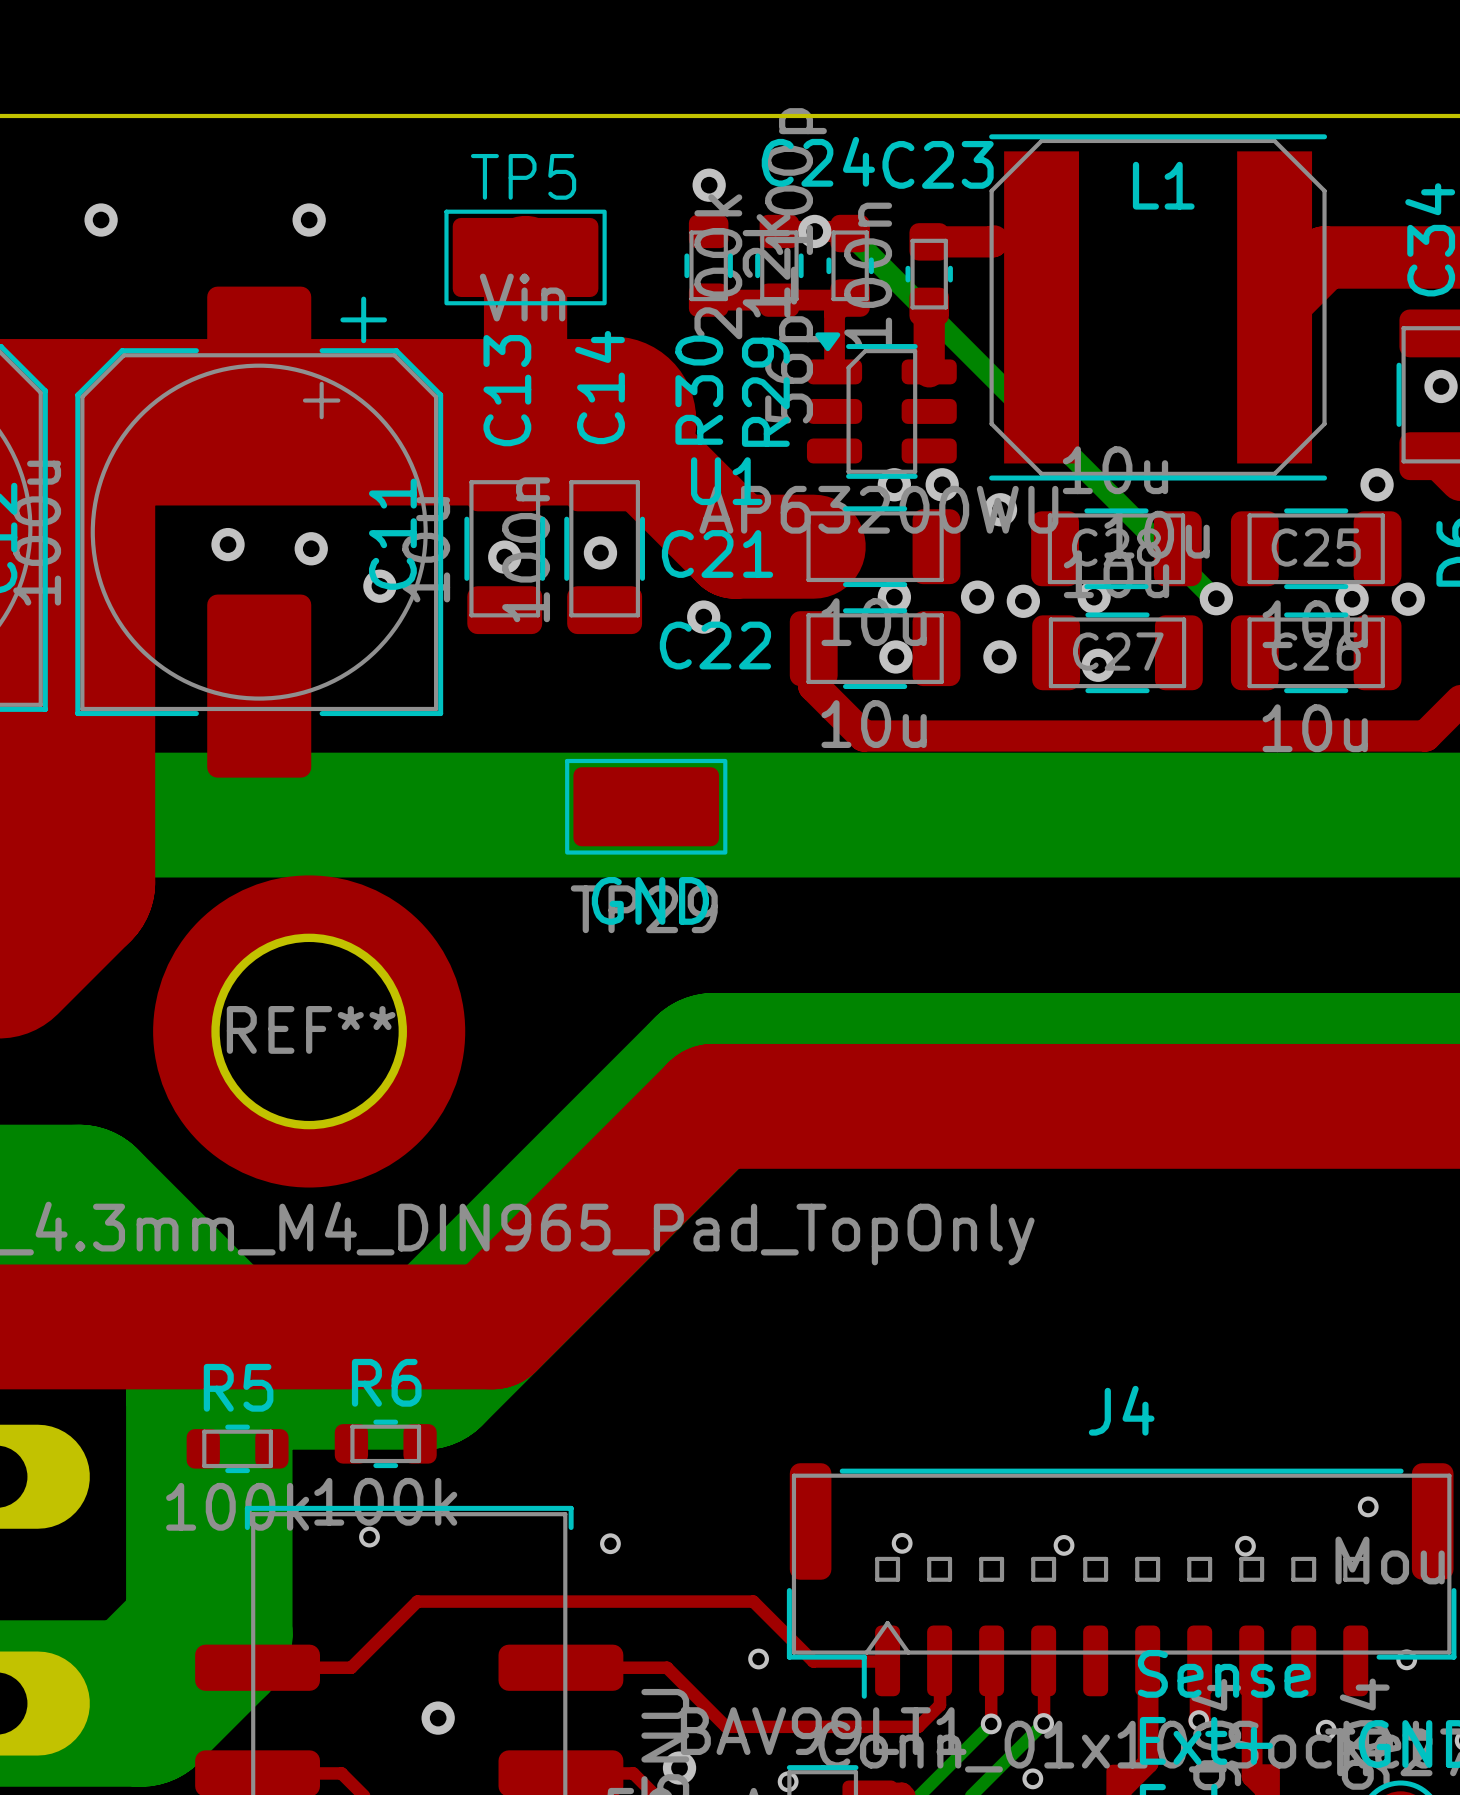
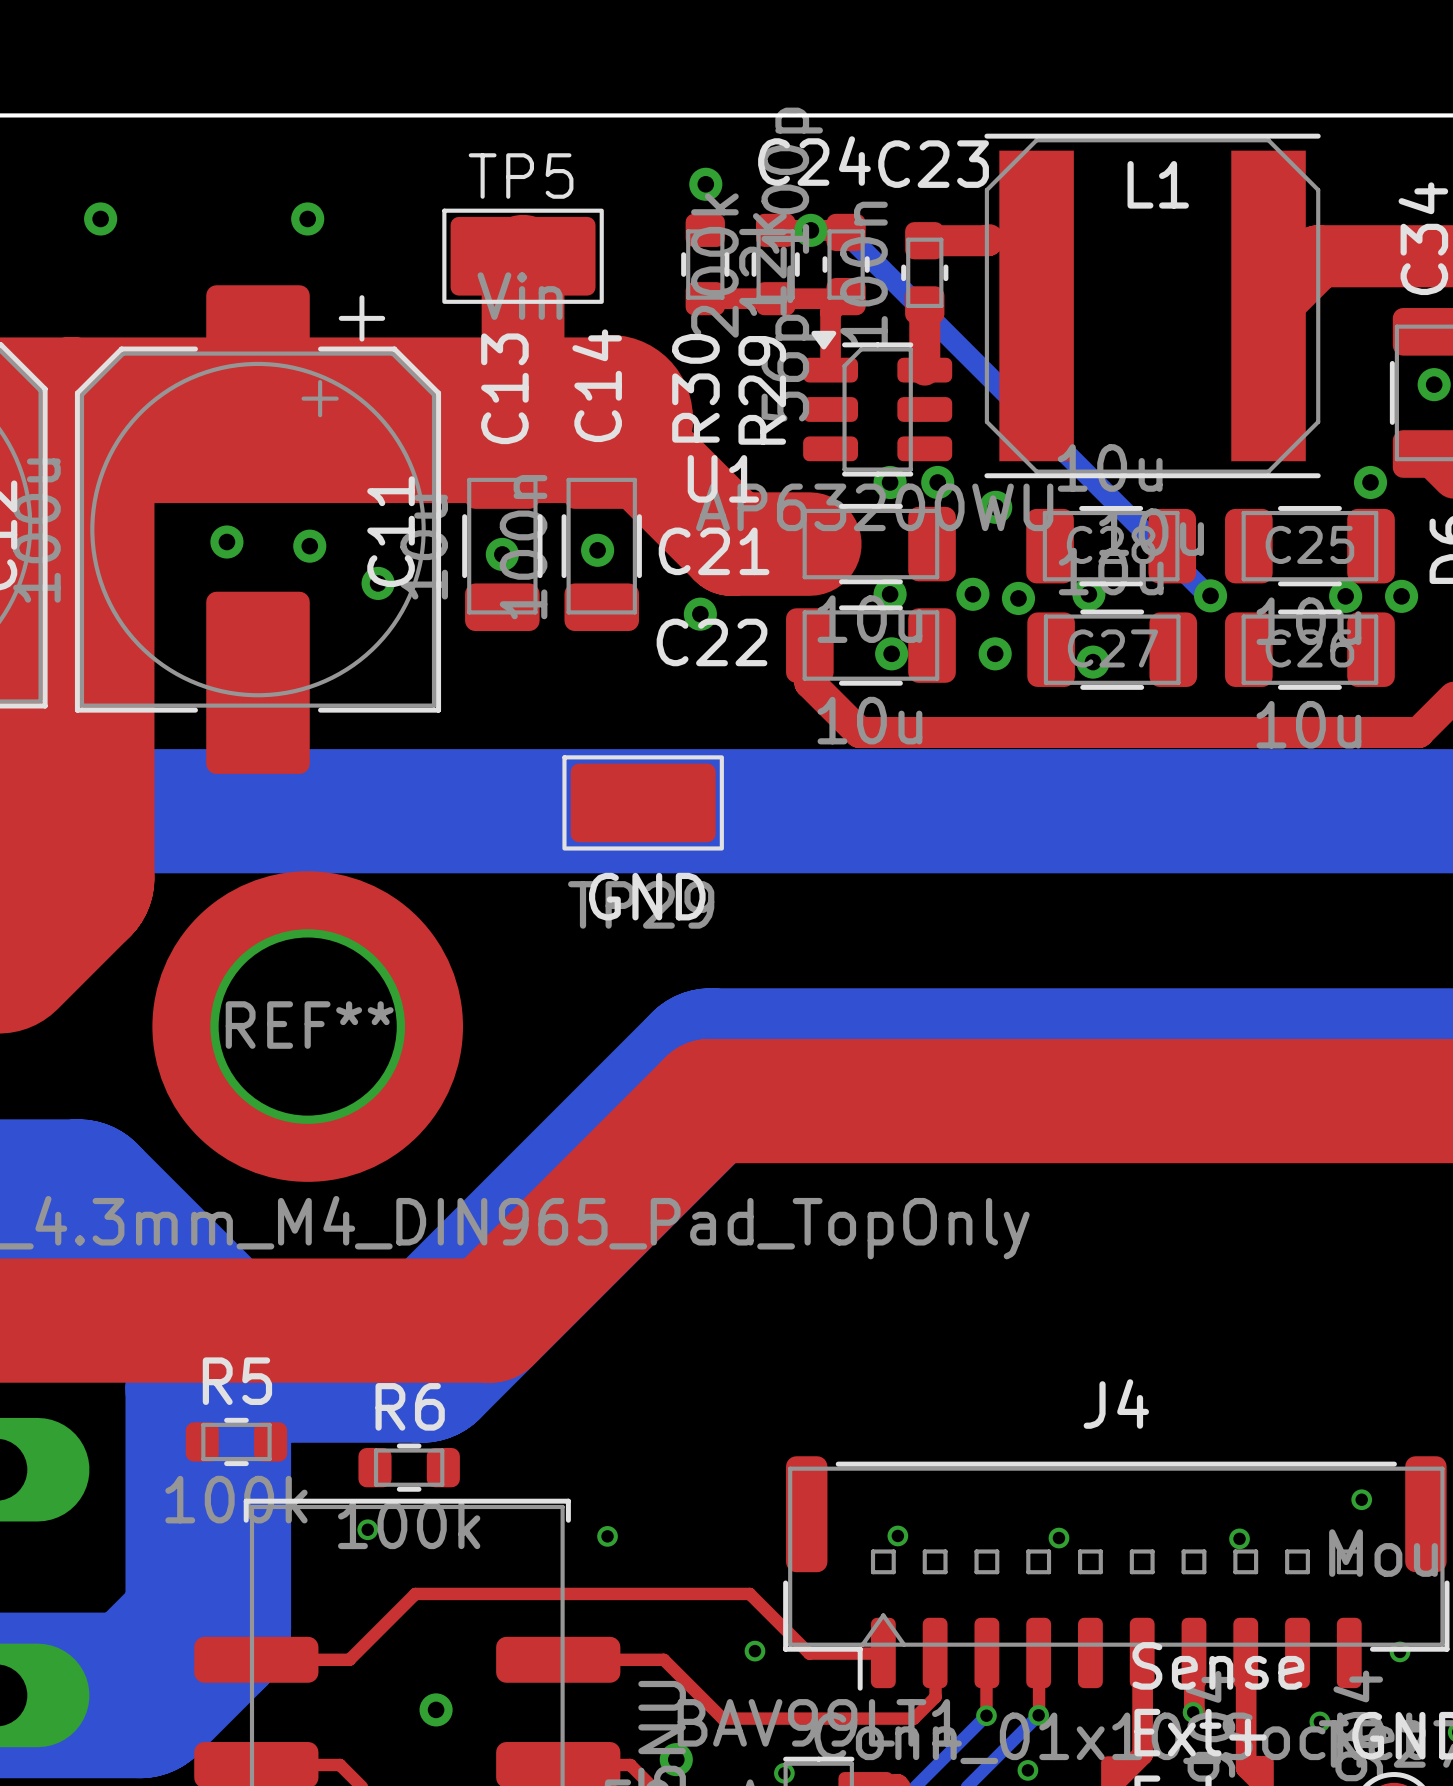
R6 position: (385, 1443) -> (409, 1467)

